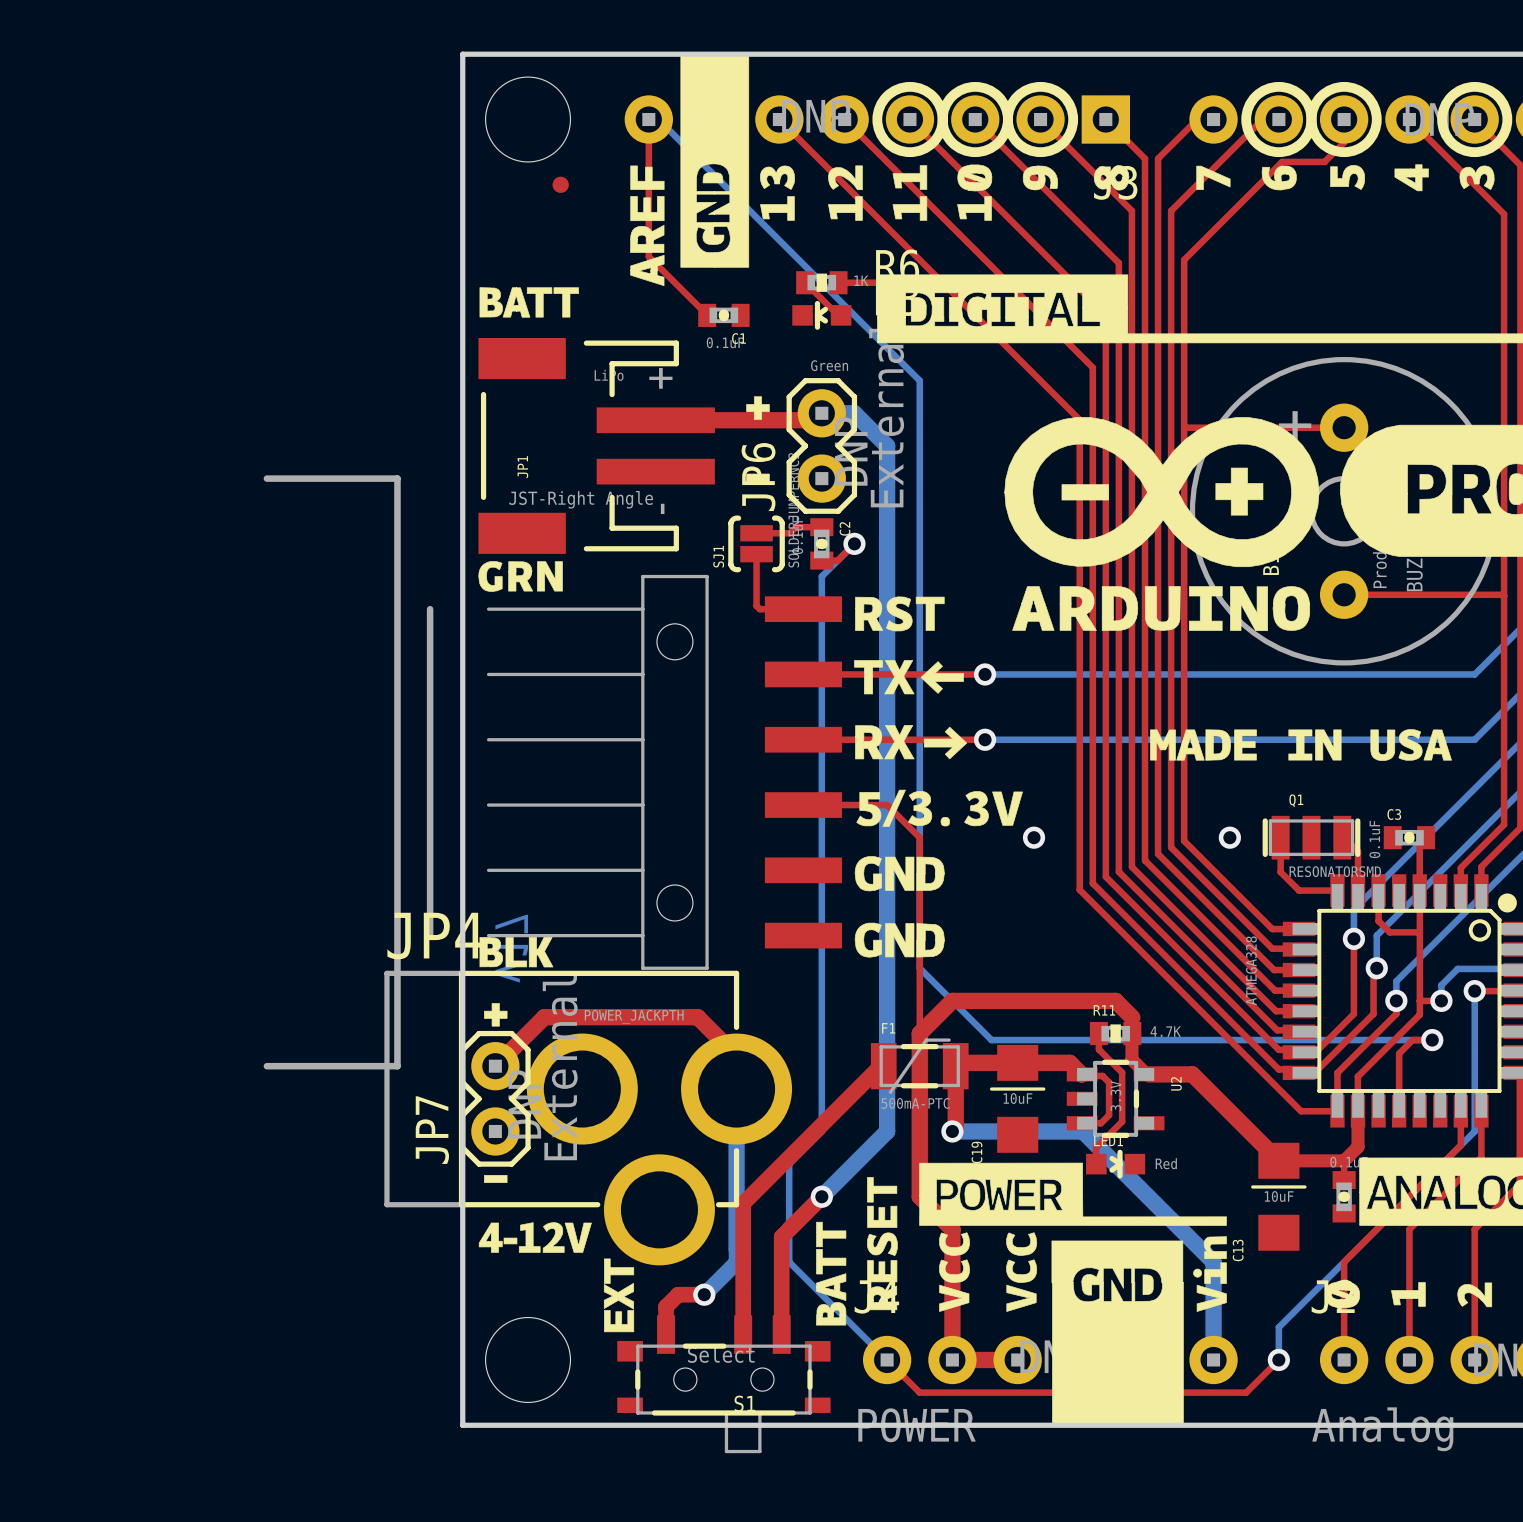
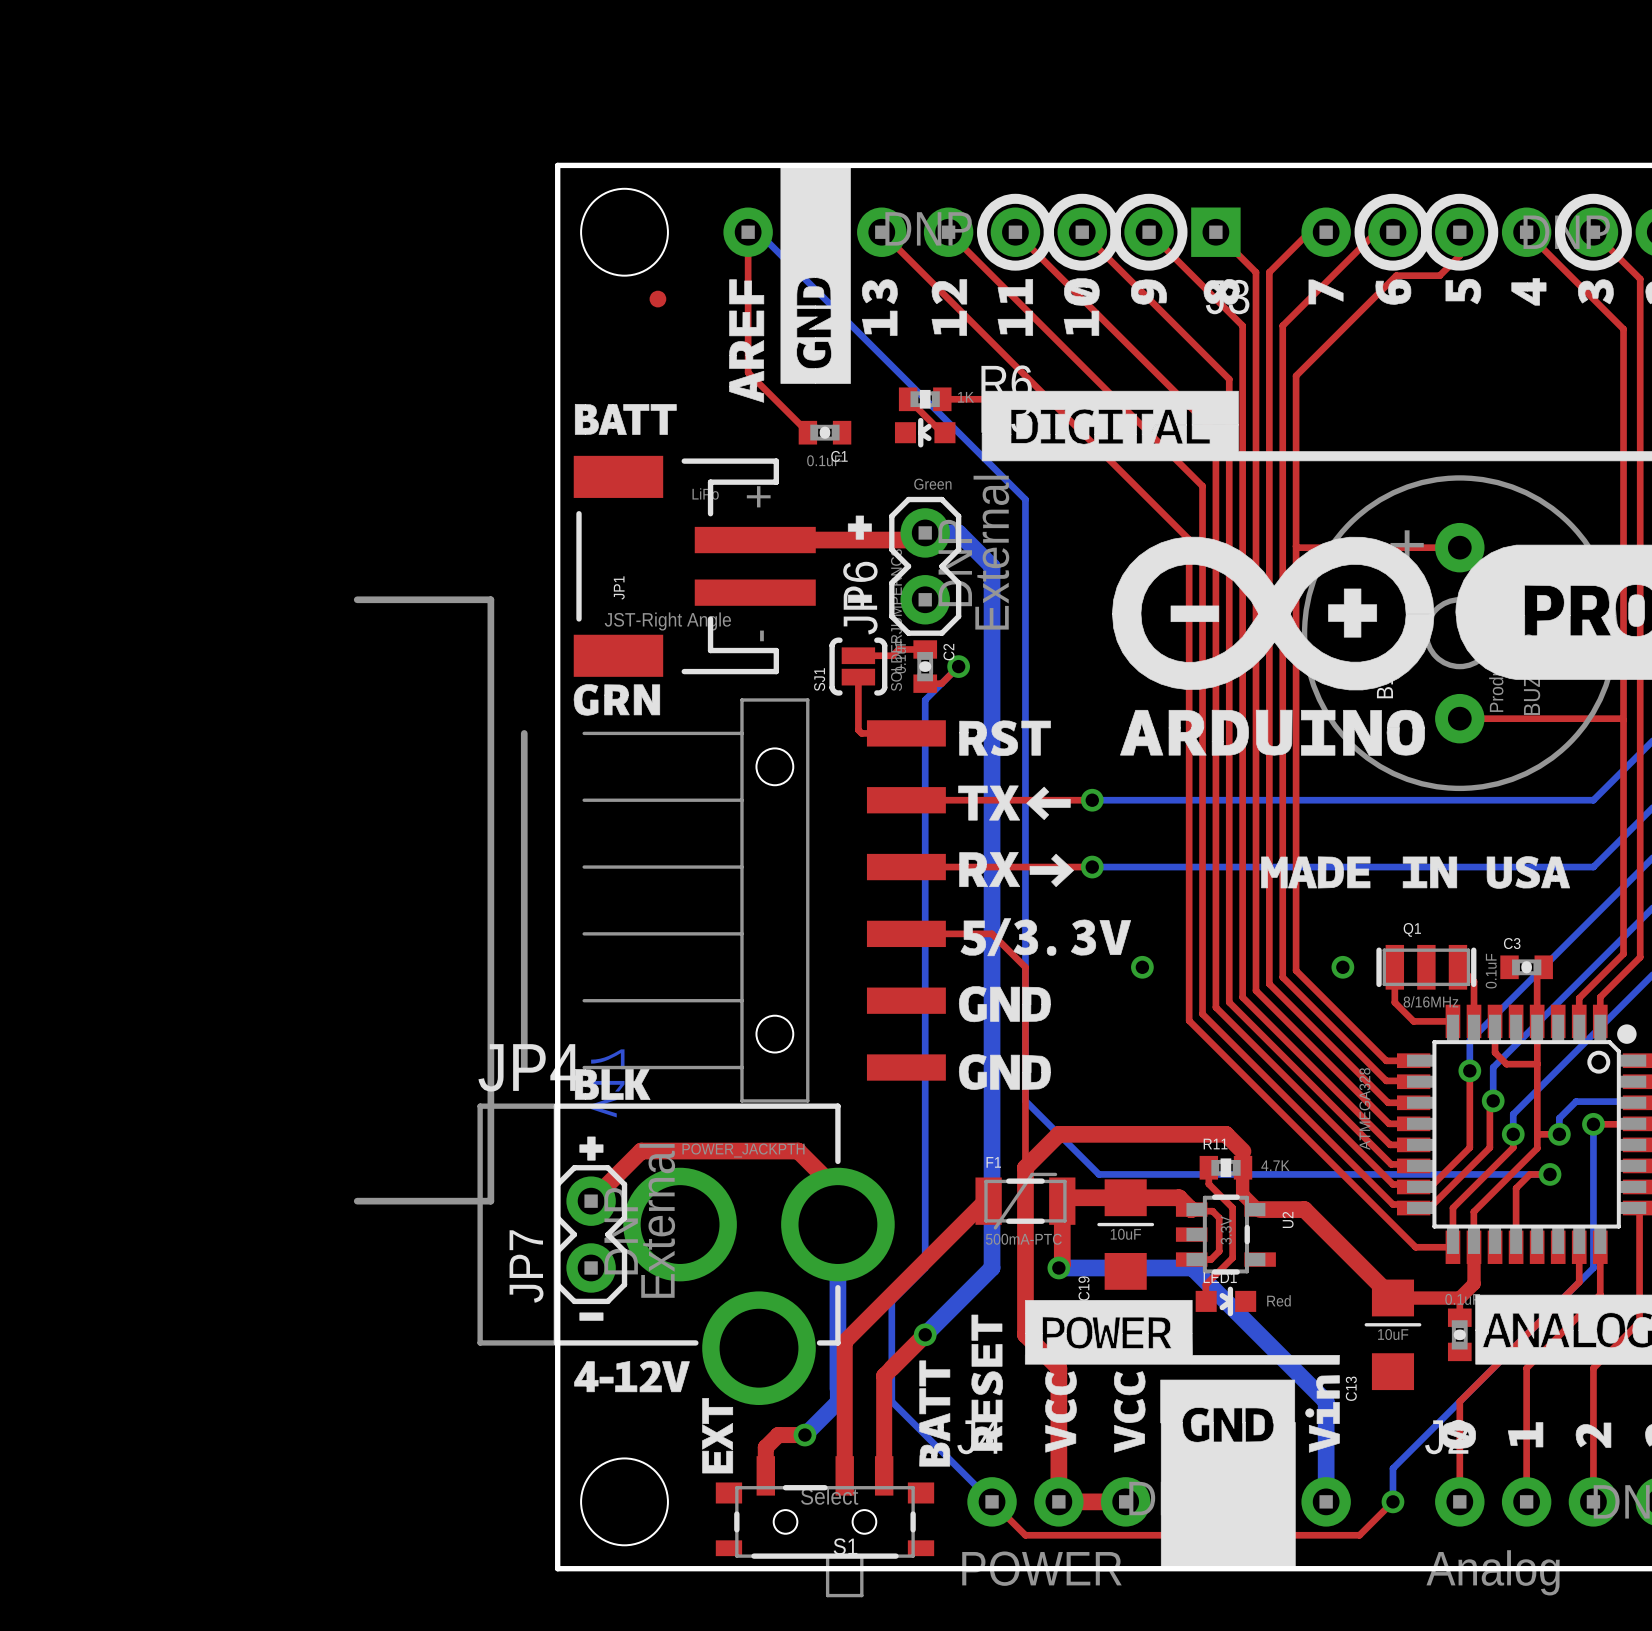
Q1 value: RESONATORSMD (1335, 871) -> 8/16MHz (1430, 1001)

